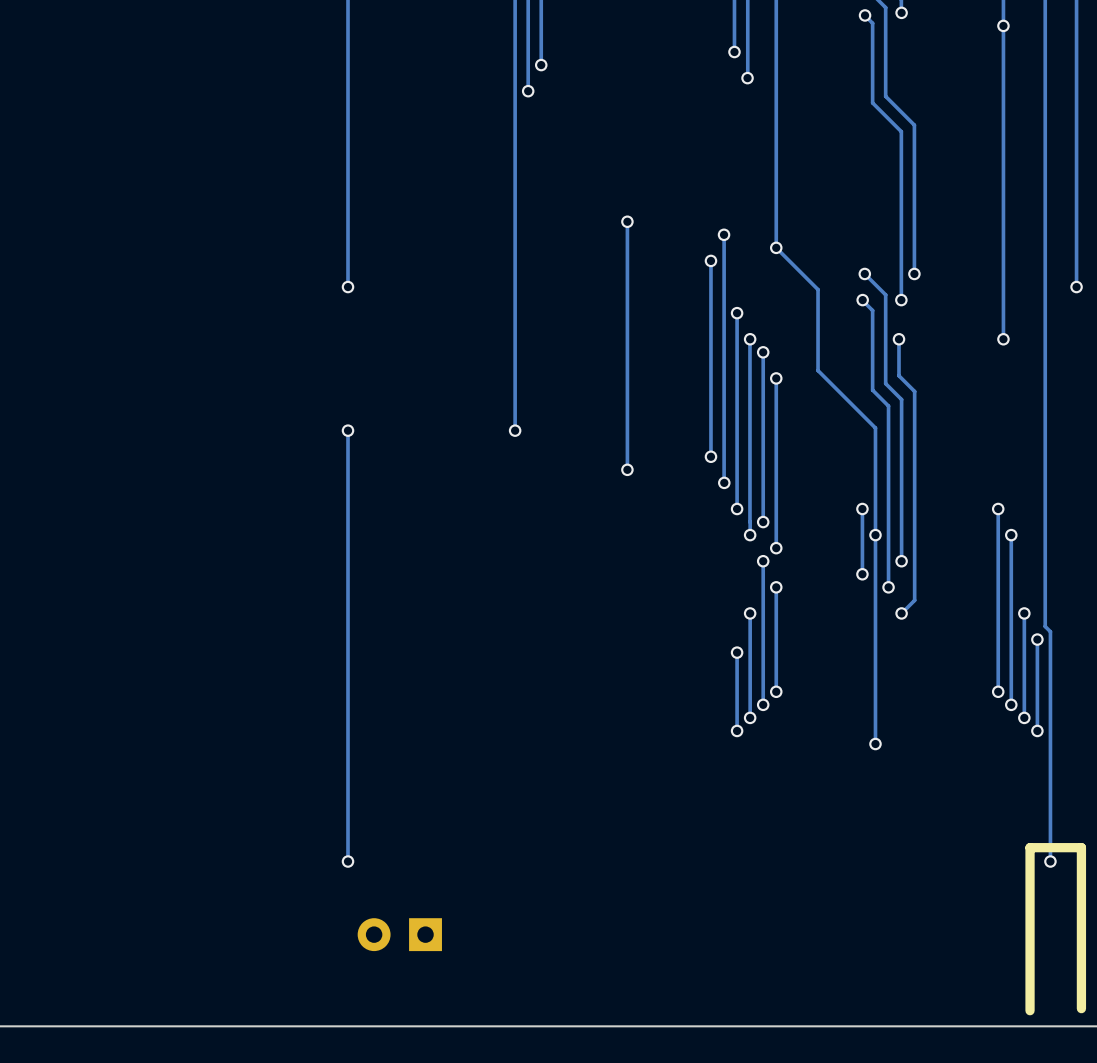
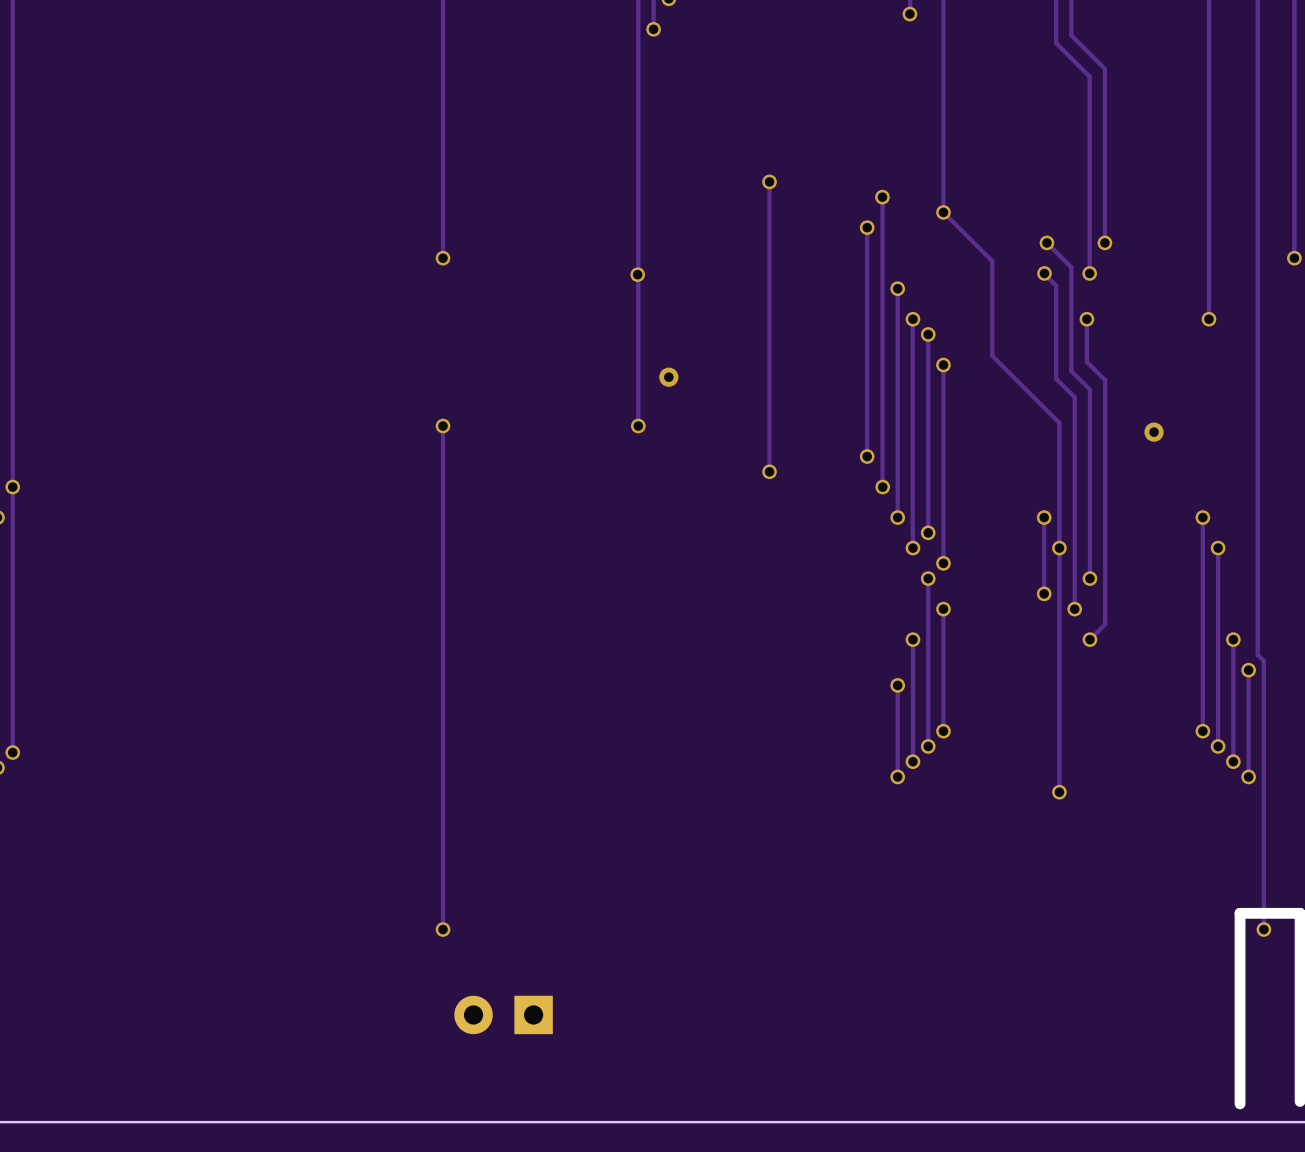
via: none -> (637, 274)
via: none -> (668, 377)
via: none -> (1154, 432)

